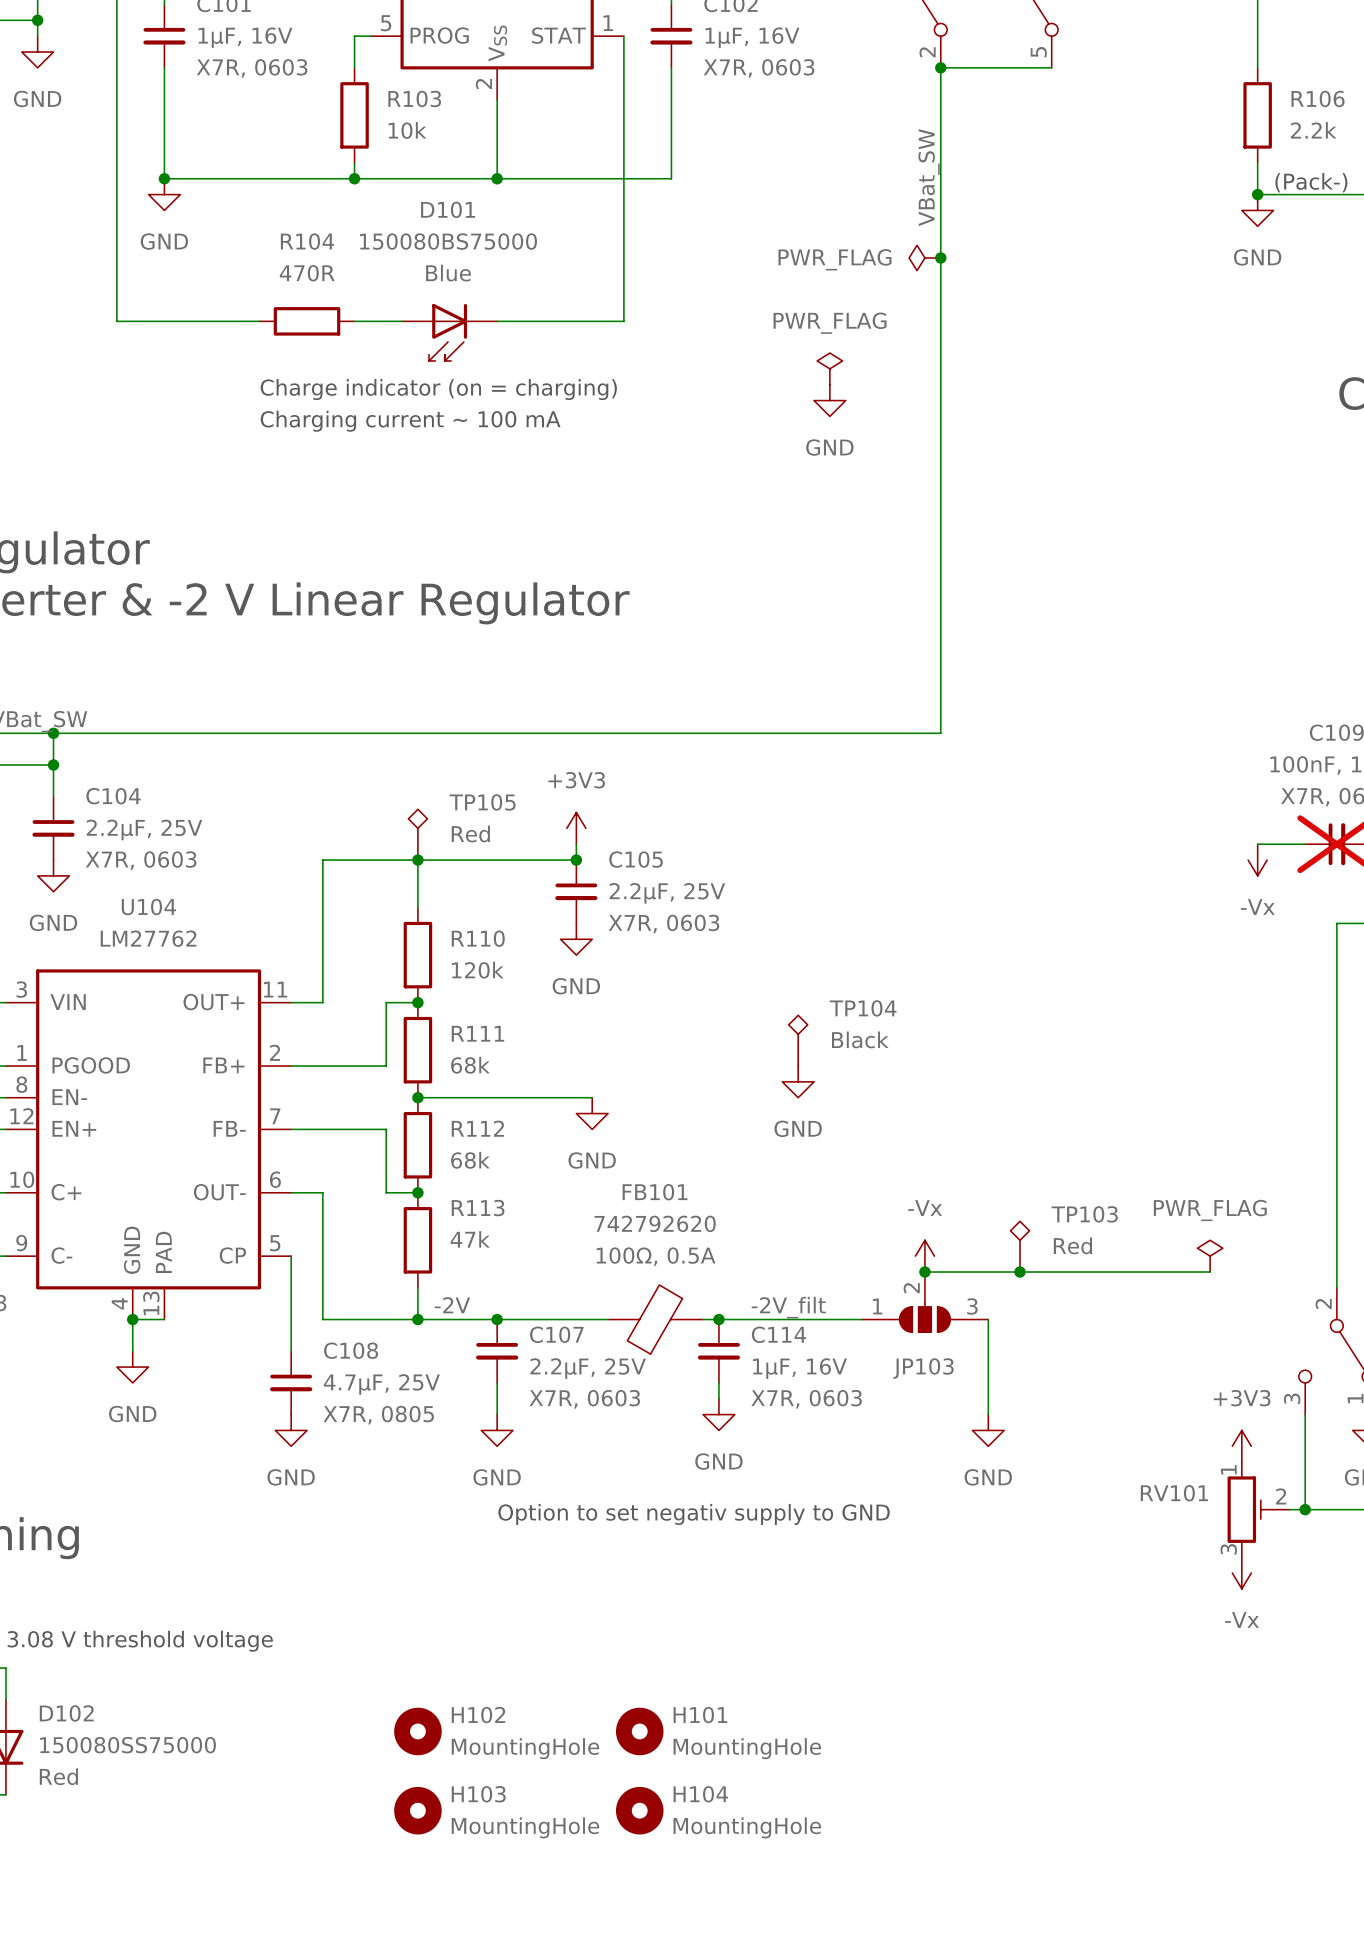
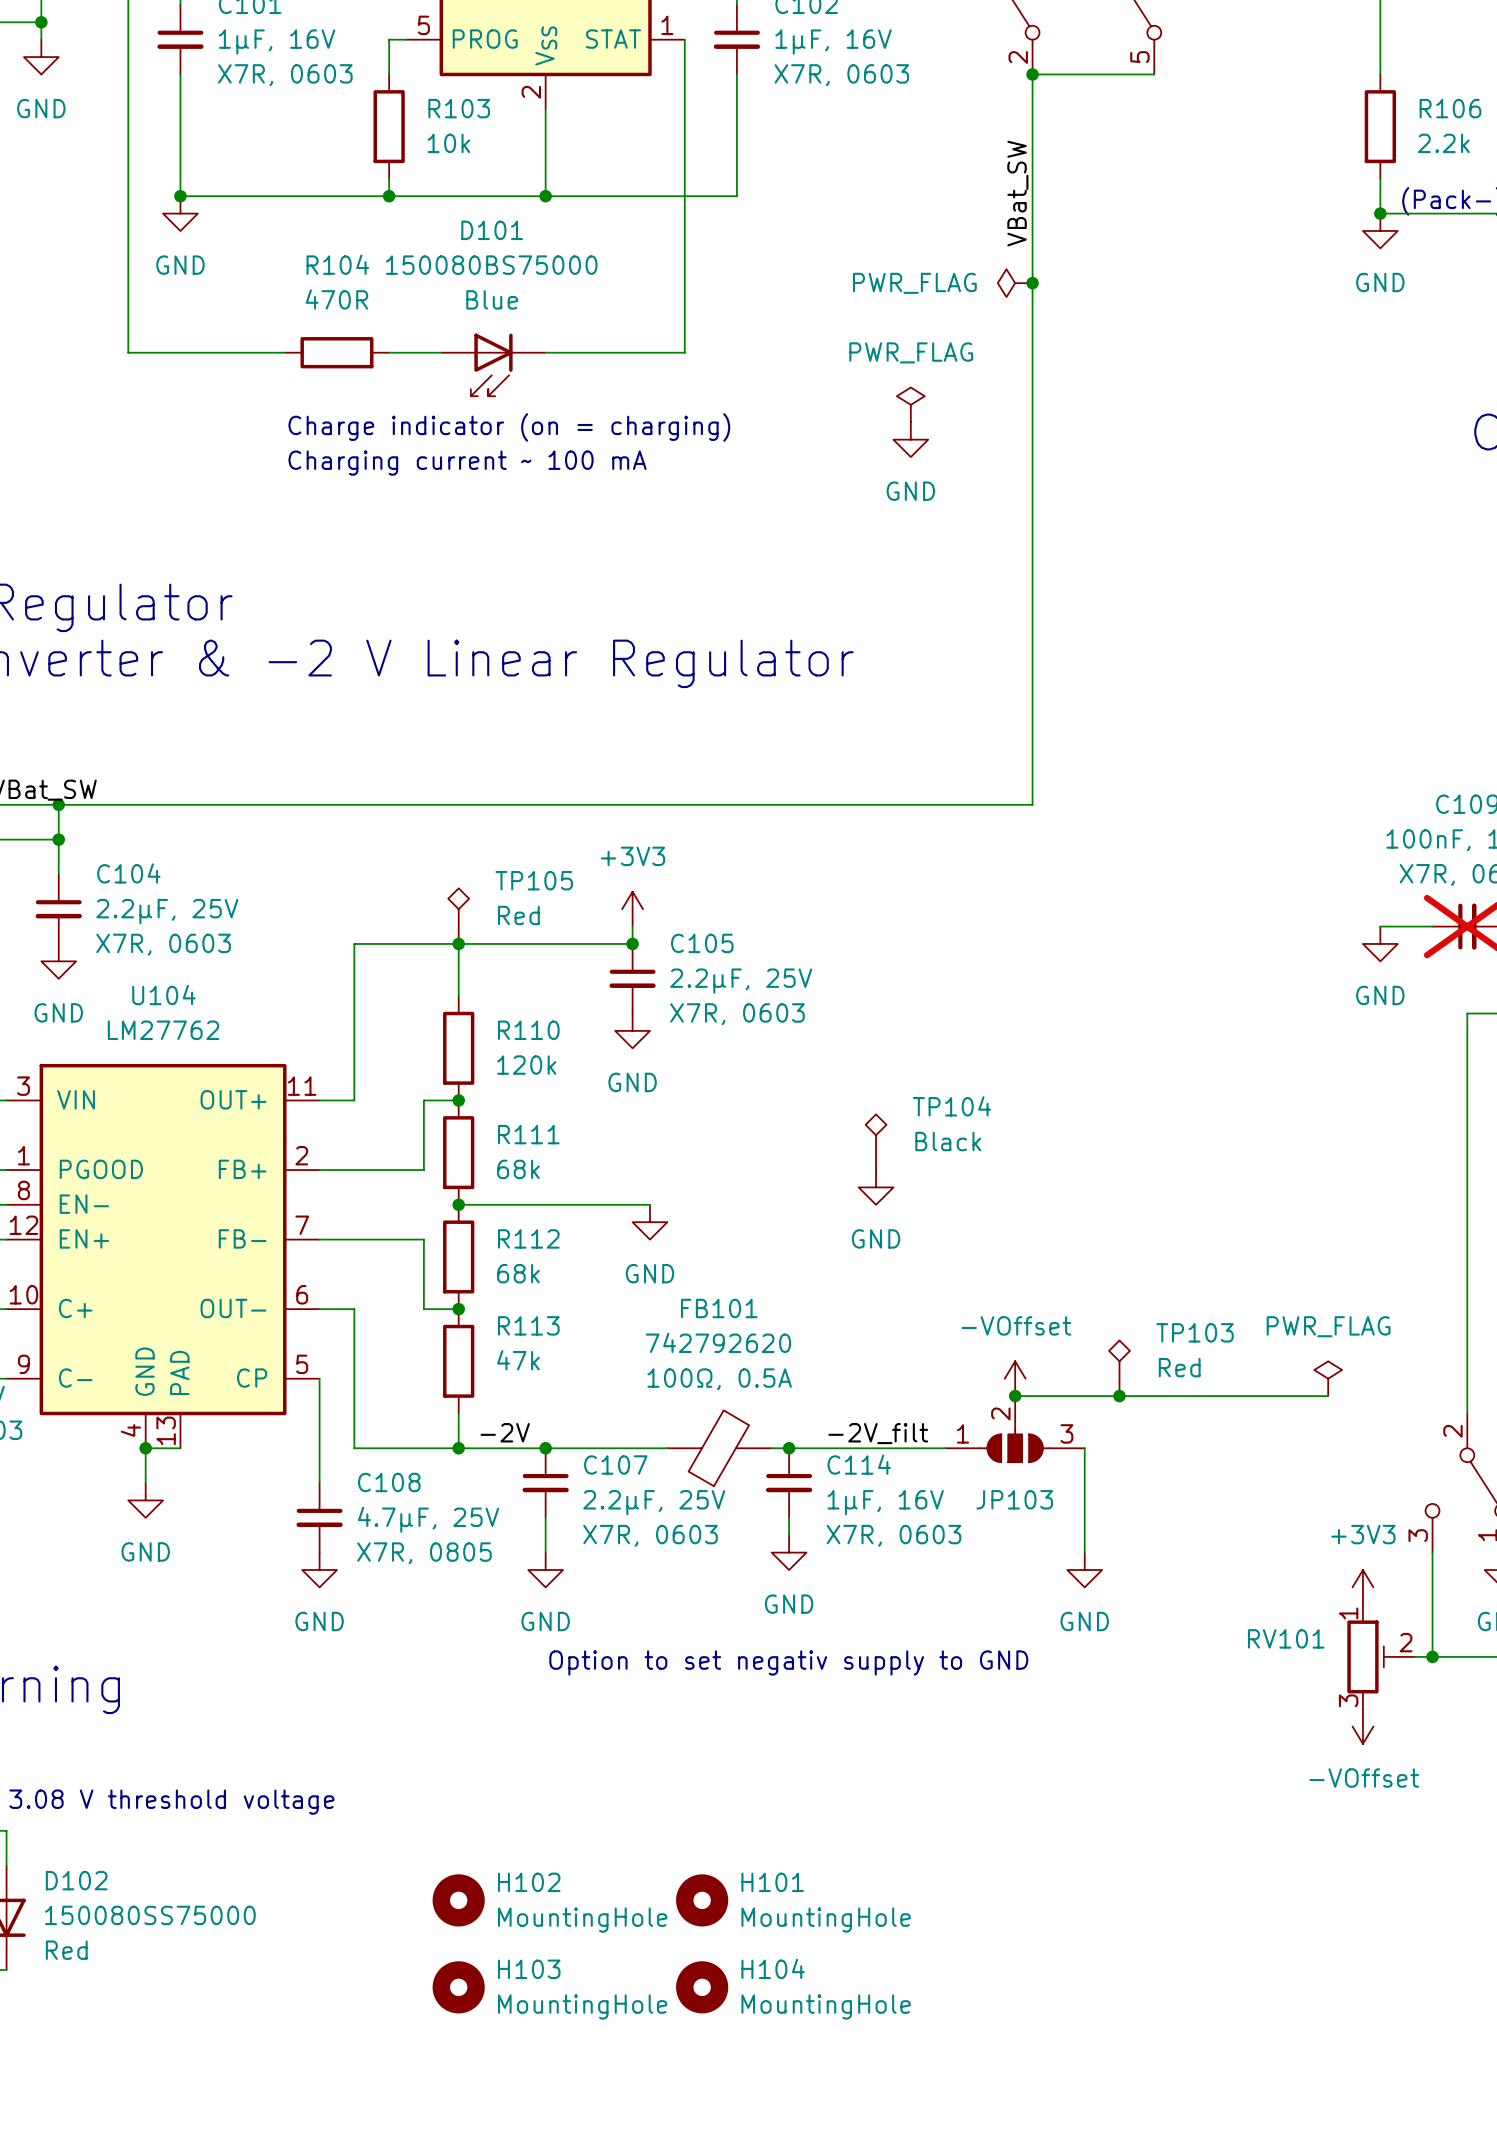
power symbol: -Vx (1257, 860) -> GND (1380, 943)
power symbol: -Vx (924, 1256) -> -VOffset (1015, 1378)
power symbol: -Vx (1241, 1573) -> -VOffset (1362, 1726)

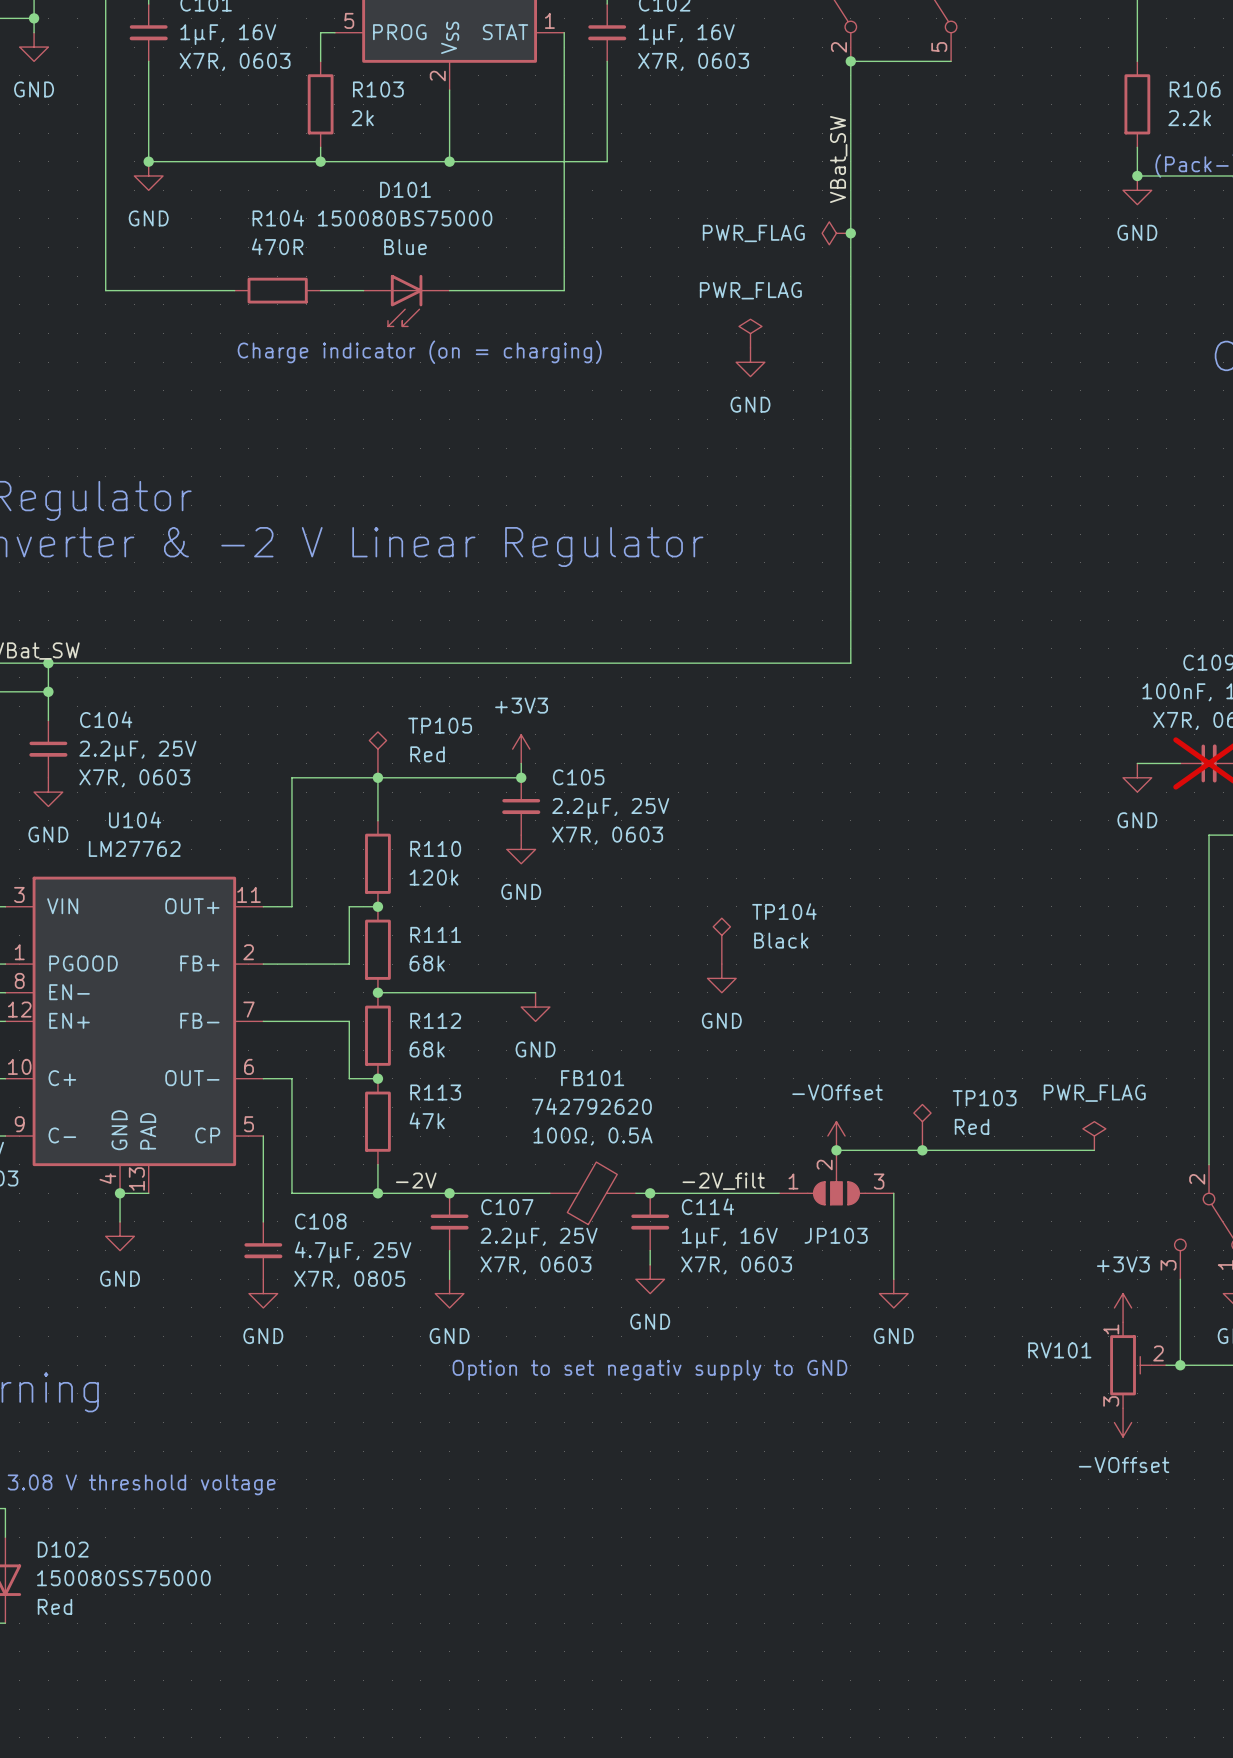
R103 text: 10k (448, 143) -> 2k (362, 118)
text: Charging current ~ 100 mA (467, 463) -> none
H102: MountingHole (458, 1900) -> none
H101: MountingHole (702, 1900) -> none
H103: MountingHole (458, 1987) -> none
H104: MountingHole (702, 1987) -> none

